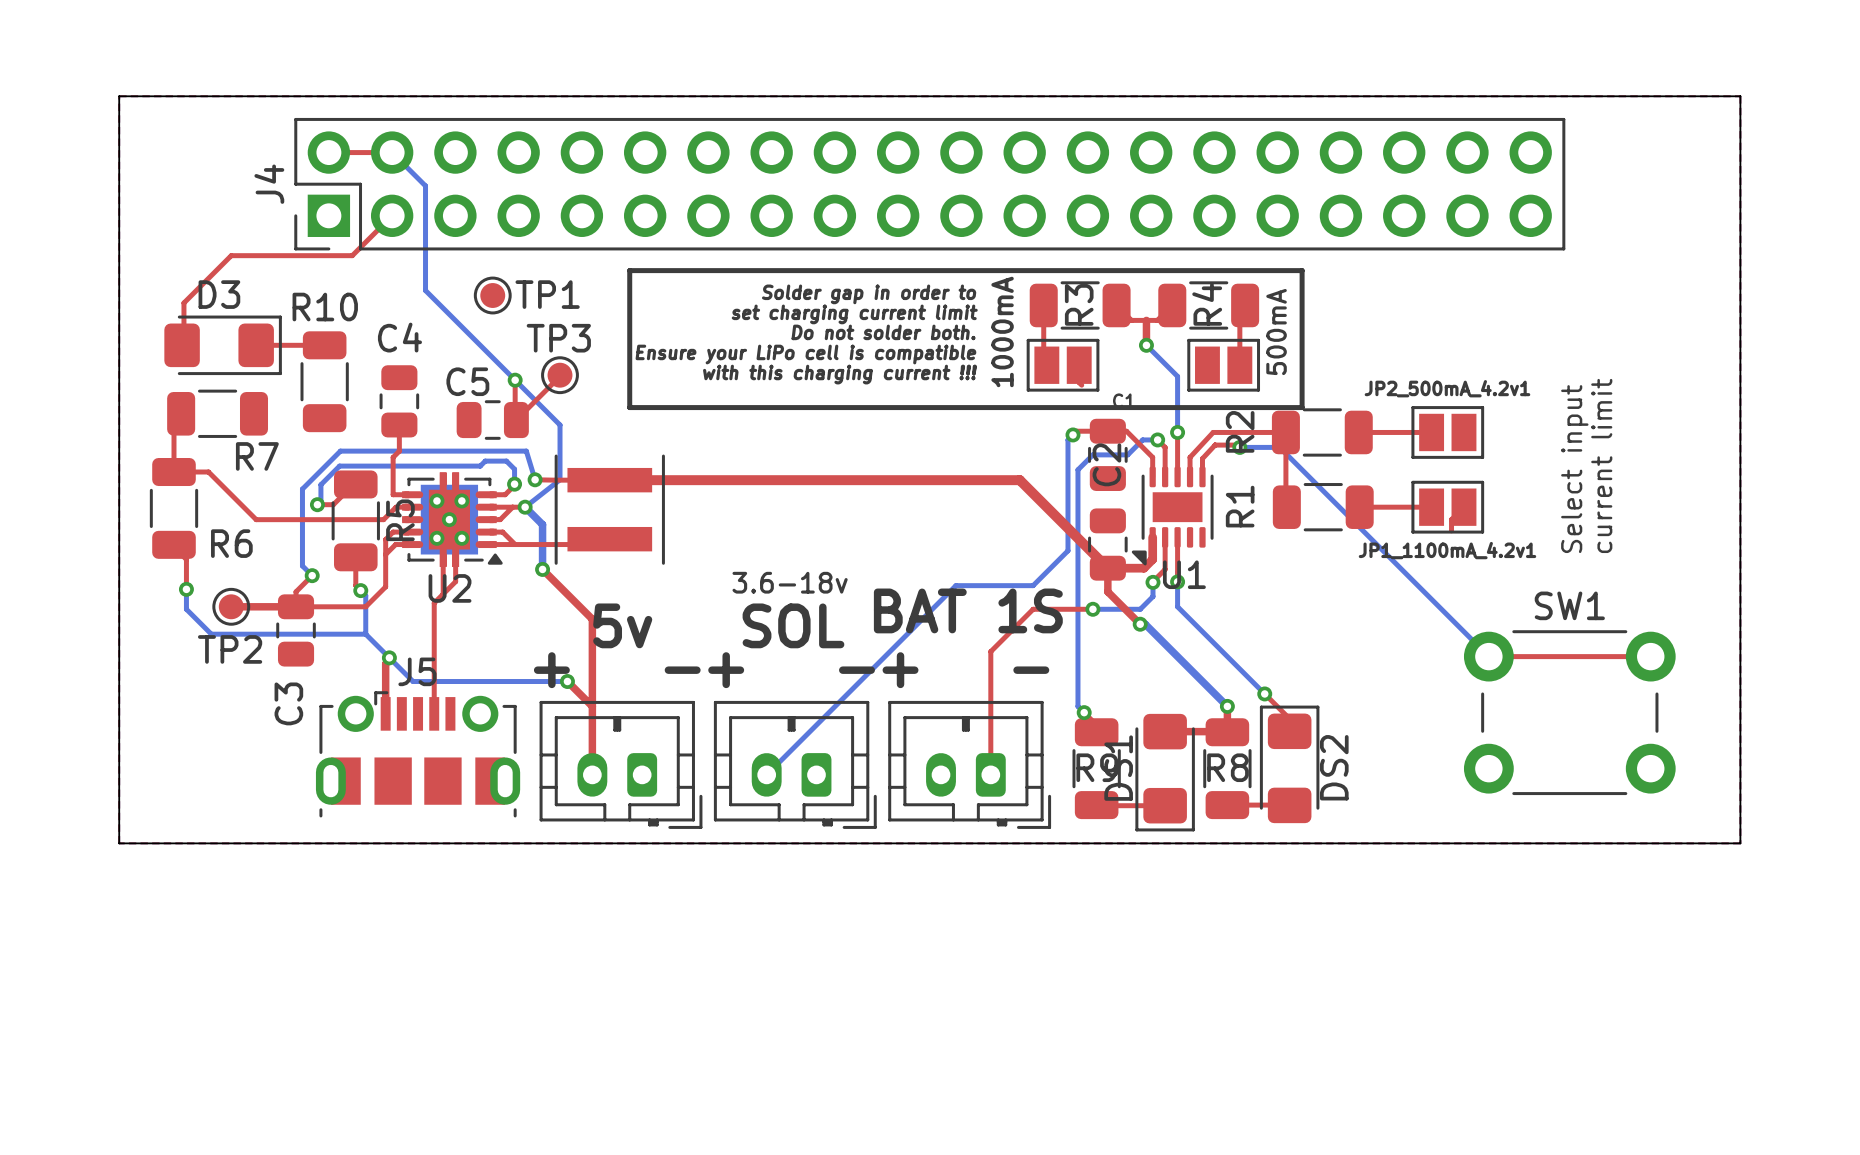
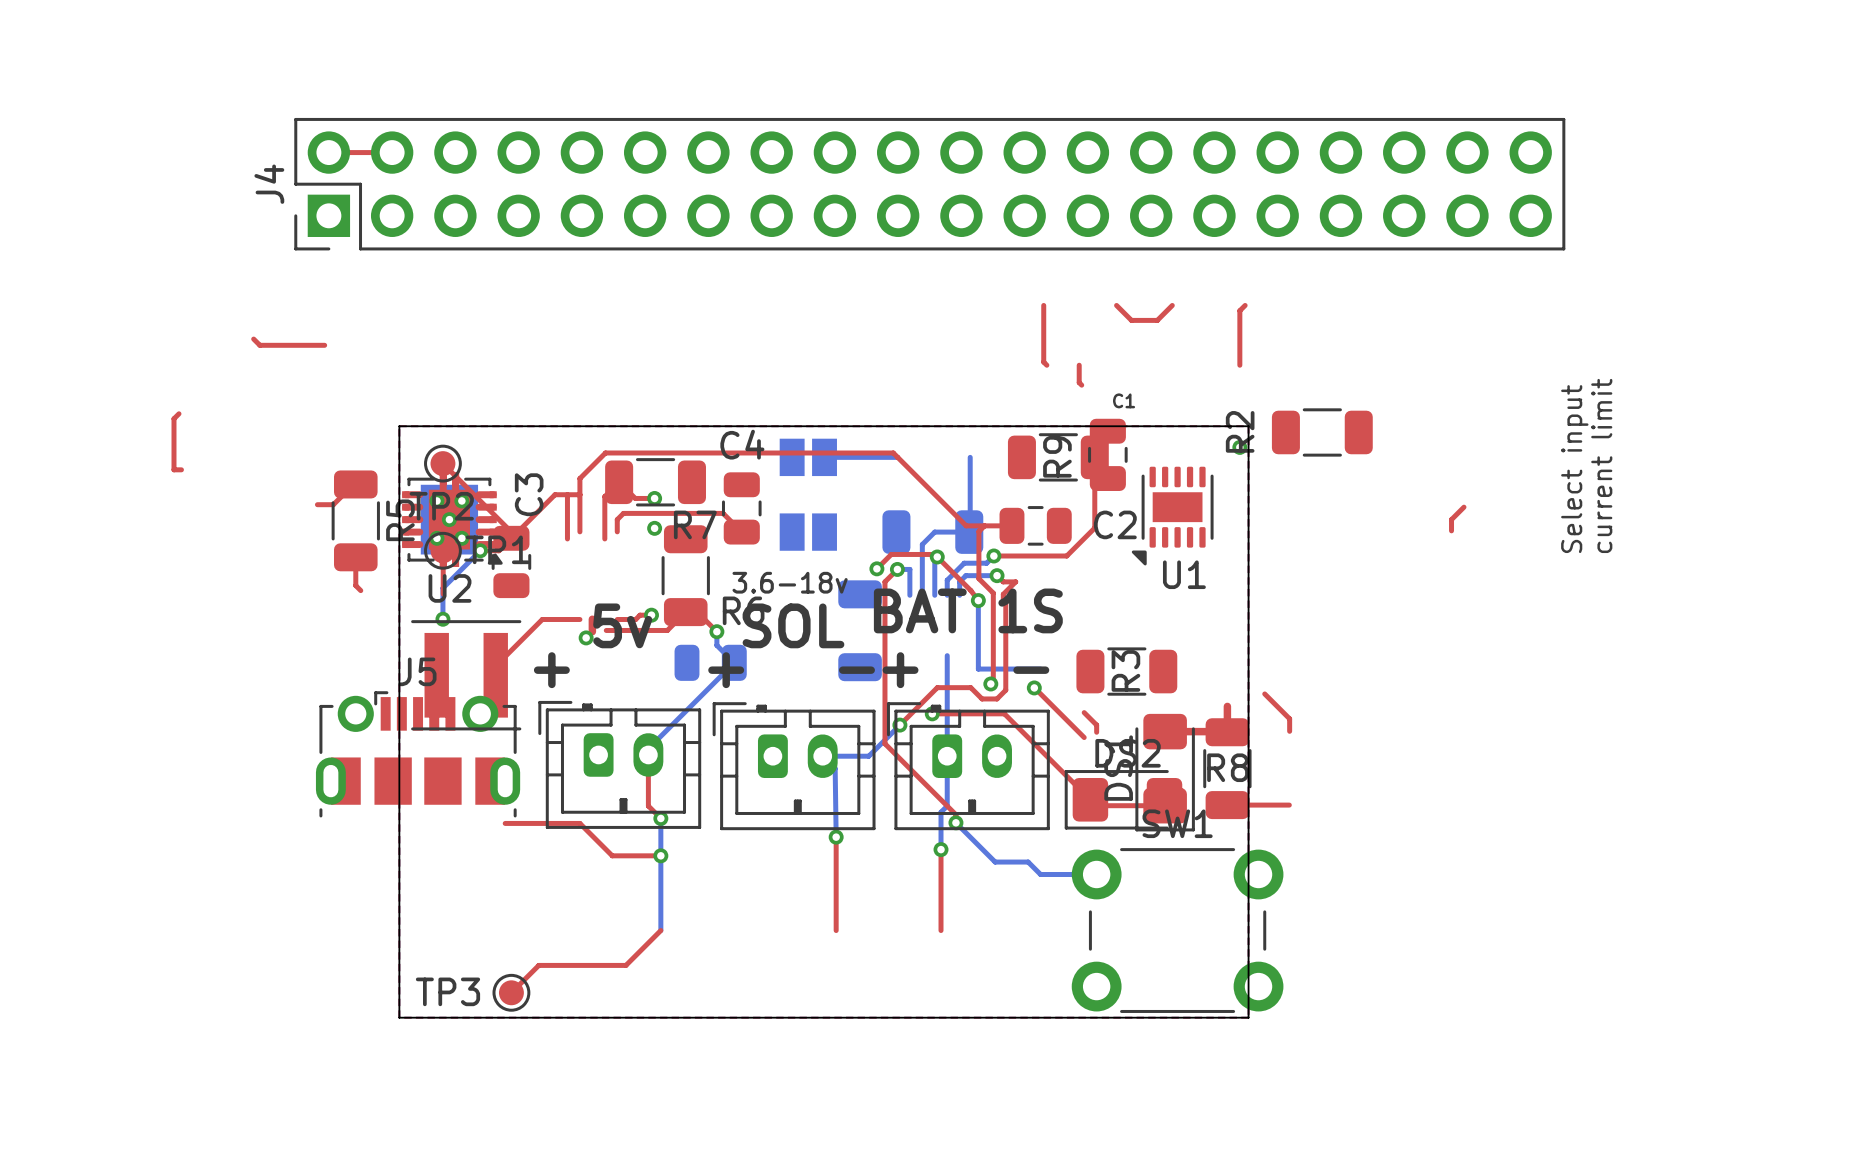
board edge: (119, 96) (1740, 96) (1740, 843) (119, 843) (119, 96) -> none
bottom track: (392, 152) (425, 185) (425, 290) (560, 425) (560, 479) (525, 507) (542, 524) (542, 569) (540, 566) -> none
top track: (392, 215) (352, 255) (231, 255) (183, 302) (183, 339) -> none
line: (629, 270) (1302, 270) (1302, 407) (629, 407) (629, 270) -> none
text: Solder gap in order to (869, 294) -> none
TP1 position: (492, 295) -> (442, 550)
R3 position: (1080, 305) -> (1126, 671)
R4: (1208, 305) -> none
text: set charging current limit (854, 314) -> none
top track: (1146, 320) (1146, 345) -> none
text: Do not solder both. (883, 332) -> none
TP3 name position: TP3 (558, 338) -> TP3 (447, 991)
D3: (223, 345) -> none
bottom track: (1146, 345) (1177, 376) (1177, 432) -> none
via: (1146, 345) -> none
text: Ensure your LiPo cell is compatible (805, 354) -> none
1000mA: (1063, 365) -> none
500mA: (1223, 365) -> none
text: with this charging current !!! (840, 374) -> none
top track: (559, 375) (516, 420) (515, 380) -> none
TP3 position: (559, 375) -> (511, 992)
via: (515, 380) -> none
R10: (324, 381) -> none
C4 position: (399, 401) -> (741, 508)
R7 position: (217, 413) -> (655, 482)
C5 side: top (492, 420) -> bottom (710, 662)
top track: (399, 425) (399, 451) (393, 457) (393, 494) (405, 494) -> none
board edge: none -> (399, 426) (1248, 426) (1248, 1017) (399, 1017) (399, 426)
top track: (1177, 432) (1177, 476) -> none
via: (1177, 432) -> none
top track: (1358, 432) (1431, 432) -> none
JP2_500mA_4.2v1: (1447, 432) -> none
top track: (1072, 434) (1076, 431) (1126, 431) (1152, 457) (1152, 476) -> none
bottom track: (1072, 434) (1067, 439) (1067, 550) (1033, 585) (955, 585) (766, 774) -> none
via: (1072, 434) -> none
top track: (1157, 439) (1165, 447) (1165, 476) -> none
bottom track: (1157, 439) (1142, 439) (1127, 454) (1092, 454) (1077, 469) (1077, 706) (1084, 712) -> none
via: (1157, 439) -> none
top track: (1239, 447) (1237, 445) (1215, 445) (1202, 458) (1202, 476) -> none
bottom track: (1239, 447) (1279, 447) (1488, 656) -> none
part: none -> (808, 457)
bottom track: none -> (824, 457) (897, 457)
bottom track: none -> (970, 457) (969, 532) (934, 532) (922, 544) (922, 595)
top track: none -> (1094, 457) (1094, 528) (1066, 555) (993, 555)
top track: none -> (442, 463) (511, 532) (511, 538)
top track: (173, 472) (208, 472) (256, 519) (383, 519) (396, 507) (405, 507) -> none
top track: (1190, 476) (1190, 457) (1213, 432) (1285, 432) (1286, 507) -> none
top track: (535, 479) (1019, 480) (1107, 568) -> none
bottom track: (535, 479) (526, 451) (340, 451) (302, 489) (302, 565) (312, 575) -> none
via: (535, 479) -> none
top track: (514, 484) (505, 494) (486, 494) -> none
bottom track: (514, 484) (514, 469) (506, 461) (485, 461) (480, 466) (339, 466) (320, 484) (320, 501) (317, 504) -> none
via: (514, 484) -> none
top track: none -> (579, 494) (555, 494) (498, 550) (480, 550)
top track: none -> (654, 498) (635, 498) (619, 482) (604, 496) (604, 538)
via: none -> (654, 498)
via: (317, 504) -> none
top track: (493, 507) (525, 507) -> none
top track: (512, 507) (500, 519) (493, 519) -> none
via: (525, 507) -> none
R1 side: top (1323, 507) -> bottom (932, 532)
top track: (1359, 507) (1431, 507) -> none
JP1_1100mA_4.2v1: (1447, 507) -> none
R6 position: (173, 508) -> (685, 575)
part rotation: 0° (609, 509) -> 90° clockwise (466, 675)
part position: (609, 509) -> (466, 675)
top track: none -> (984, 525) (978, 531) (978, 578) (993, 593) (993, 681) (990, 683)
top track: none -> (1011, 525) (966, 525) (893, 452) (605, 452) (579, 478) (579, 531)
via: none -> (654, 528)
top track: none -> (617, 531) (617, 519) (623, 513) (723, 513) (741, 532)
top track: (405, 532) (393, 532) (385, 539) (385, 586) (365, 606) (296, 606) -> none
top track: (493, 532) (502, 532) (515, 544) -> none
part: none -> (808, 532)
top track: (1152, 537) (1152, 559) (1143, 568) (1107, 568) -> none
top track: (1165, 537) (1165, 569) (1152, 582) -> none
top track: (1177, 537) (1177, 581) -> (567, 494) (567, 538)
top track: (609, 539) (604, 544) (493, 544) -> none
top track: (405, 544) (395, 544) (385, 554) -> none
C2 rotation: 0° (1107, 544) -> 90° clockwise (1035, 525)
C2 position: (1107, 544) -> (1035, 525)
top track: (173, 547) (186, 559) (186, 589) -> none
bottom track: none -> (480, 550) (442, 588) (442, 619)
via: none -> (480, 550)
bottom track: none -> (993, 555) (986, 563) (964, 563) (947, 580) (947, 595)
via: none -> (993, 555)
bottom track: none -> (937, 556) (934, 559) (934, 595)
via: none -> (937, 556)
top track: (455, 560) (455, 581) (434, 603) (434, 713) -> none
top track: none -> (876, 568) (891, 554) (934, 554) (978, 600)
via: none -> (876, 568)
top track: (1107, 568) (1107, 591) (1140, 624) -> none
top track: (542, 569) (592, 619) -> (1034, 687) (1084, 737)
via: (542, 569) -> none
top track: none -> (897, 569) (884, 581) (884, 743) (955, 814) (955, 822)
bottom track: none -> (897, 569) (909, 569) (909, 595)
via: none -> (897, 569)
bottom track: (1177, 571) (1177, 606) (1264, 693) -> none
top track: (312, 575) (296, 591) (296, 606) -> none
via: (312, 575) -> none
top track: none -> (997, 575) (1003, 581) (1015, 581) (1003, 594) (1003, 600) (1005, 603) (1005, 690) (997, 698) (982, 698) (970, 687) (937, 687) (899, 725)
bottom track: none -> (997, 575) (965, 575) (959, 581) (959, 595)
via: none -> (997, 575)
via: (1177, 581) -> none
bottom track: (1152, 582) (1152, 596) (1140, 609) (1092, 609) -> none
via: (1152, 582) -> none
bottom track: (186, 589) (186, 609) (211, 634) (365, 634) -> none
via: (186, 589) -> none
bottom track: (360, 590) (365, 595) (365, 634) -> none
via: (360, 590) -> none
bottom track: none -> (978, 600) (978, 669) (1040, 669)
via: none -> (978, 600)
top track: (233, 604) (231, 606) (296, 606) -> none
TP2 position: (231, 606) -> (442, 463)
top track: (1092, 609) (1033, 609) (990, 651) (990, 774) -> none
via: (1092, 609) -> none
top track: none -> (651, 615) (640, 615) (635, 619) (617, 619)
via: none -> (651, 615)
via: none -> (442, 619)
top track: none -> (579, 619) (542, 619) (495, 666) (495, 675)
bottom track: (1140, 624) (1145, 624) (1227, 706) -> none
via: (1140, 624) -> none
C3 position: (296, 630) -> (511, 561)
top track: none -> (606, 630) (667, 630) (685, 612) (697, 612) (716, 631)
part: none -> (860, 630)
top track: (592, 631) (592, 774) -> none
bottom track: none -> (716, 631) (716, 645) (734, 662) (648, 748) (648, 754)
via: none -> (716, 631)
bottom track: (365, 634) (413, 681) (567, 681) -> none
via: none -> (586, 637)
bottom track: none -> (947, 655) (947, 806) (941, 812) (941, 849)
top track: (1488, 656) (1650, 656) -> none
top track: (389, 657) (385, 664) (385, 713) -> none
via: (389, 657) -> none
text: - (682, 670) -> none
top track: (567, 681) (592, 706) -> none
via: (567, 681) -> none
via: none -> (990, 683)
via: none -> (1034, 687)
via: (1264, 693) -> none
C3 name position: C3 (288, 703) -> C3 (529, 494)
via: (1227, 706) -> none
via: (1084, 712) -> none
SW1 position: (1569, 712) -> (1177, 930)
top track: none -> (932, 713) (1004, 713) (1090, 799)
via: none -> (932, 713)
bottom track: none -> (899, 725) (868, 756) (822, 756) (835, 768) (836, 837)
via: none -> (899, 725)
top track: none -> (648, 754) (648, 806) (660, 818)
part rotation: 0° (621, 764) -> 180° (619, 764)
part rotation: 0° (795, 764) -> 180° (794, 766)
part rotation: 0° (969, 764) -> 180° (968, 766)
DS2 rotation: 0° (1289, 764) -> 90° counterclockwise (1123, 799)
DS2 position: (1289, 764) -> (1123, 799)
R9 rotation: 0° (1096, 768) -> 90° clockwise (1058, 457)
R9 position: (1096, 768) -> (1058, 457)
bottom track: none -> (660, 818) (660, 930)
via: none -> (660, 818)
bottom track: none -> (955, 822) (995, 862) (1028, 862) (1040, 874) (1096, 874)
via: none -> (955, 822)
top track: none -> (505, 823) (579, 823) (612, 855) (660, 855)
top track: none -> (836, 837) (836, 930)
via: none -> (836, 837)
top track: none -> (941, 849) (941, 930)
via: none -> (941, 849)
via: none -> (660, 855)
top track: none -> (660, 930) (625, 965) (538, 965) (511, 992)

